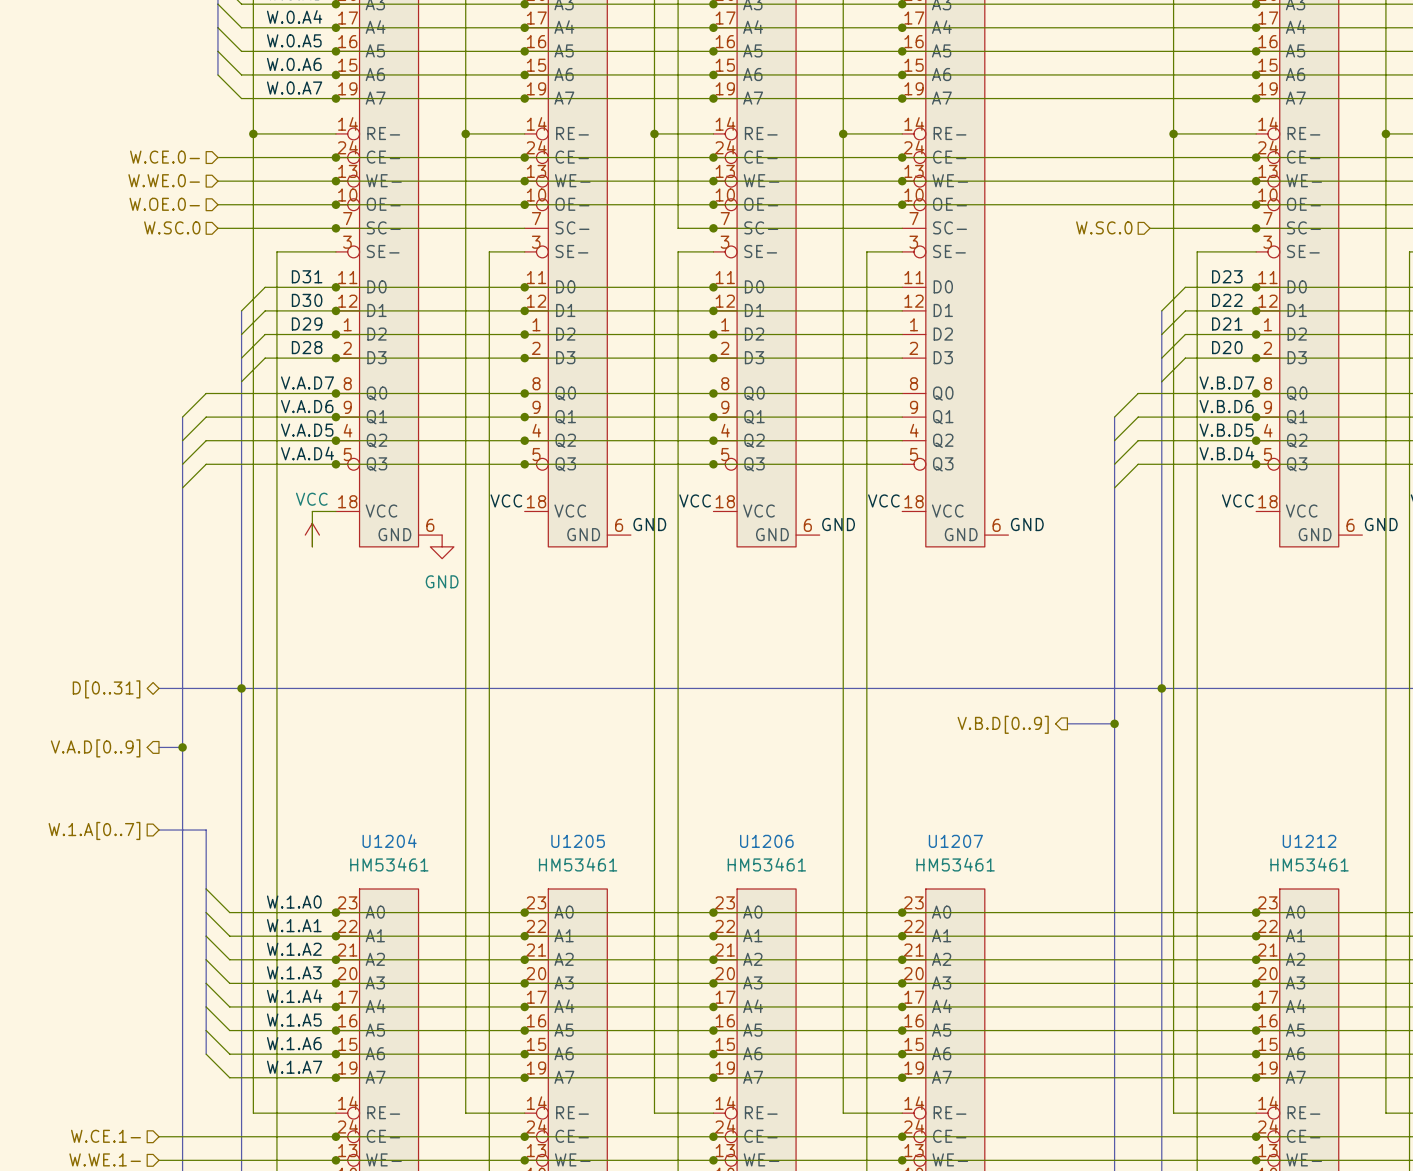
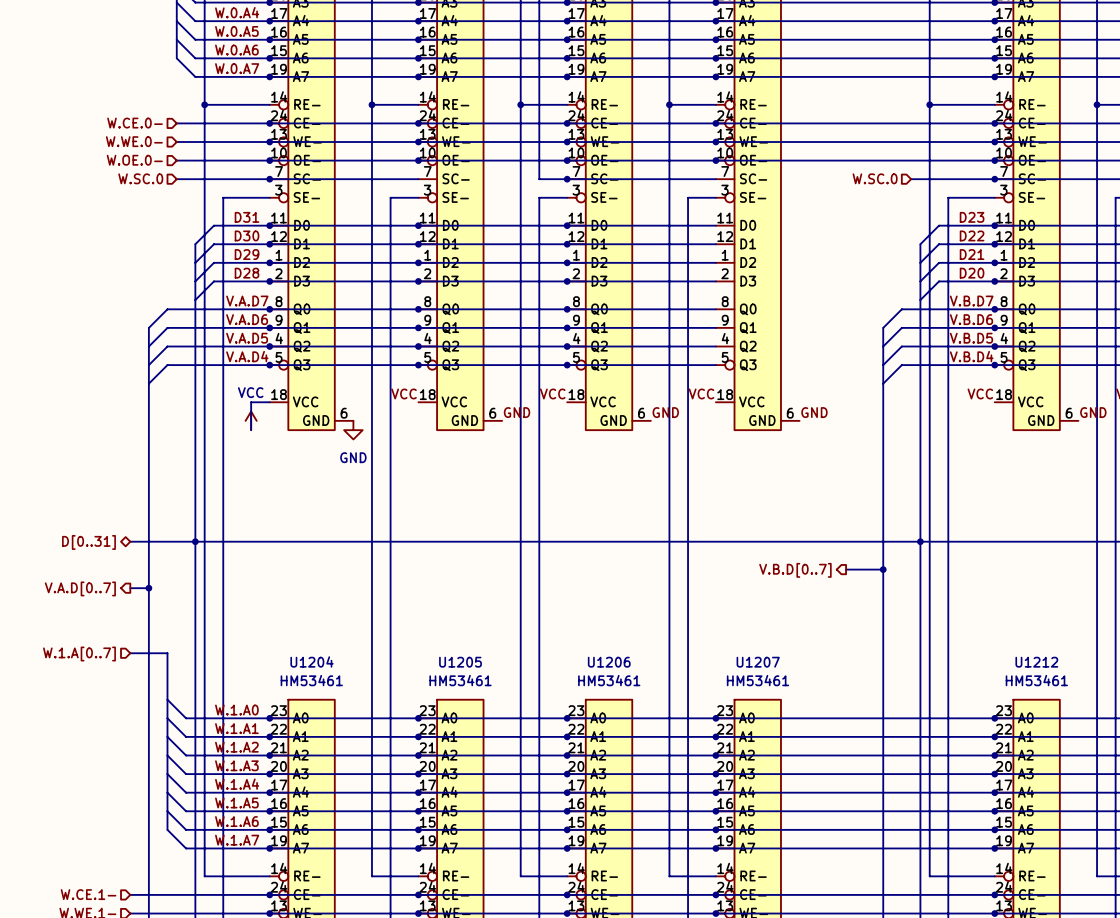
hierarchical label: V.B.D[0..9] (1003, 724) -> V.B.D[0..7] (795, 570)
hierarchical label: V.A.D[0..9] (95, 748) -> V.A.D[0..7] (80, 588)

